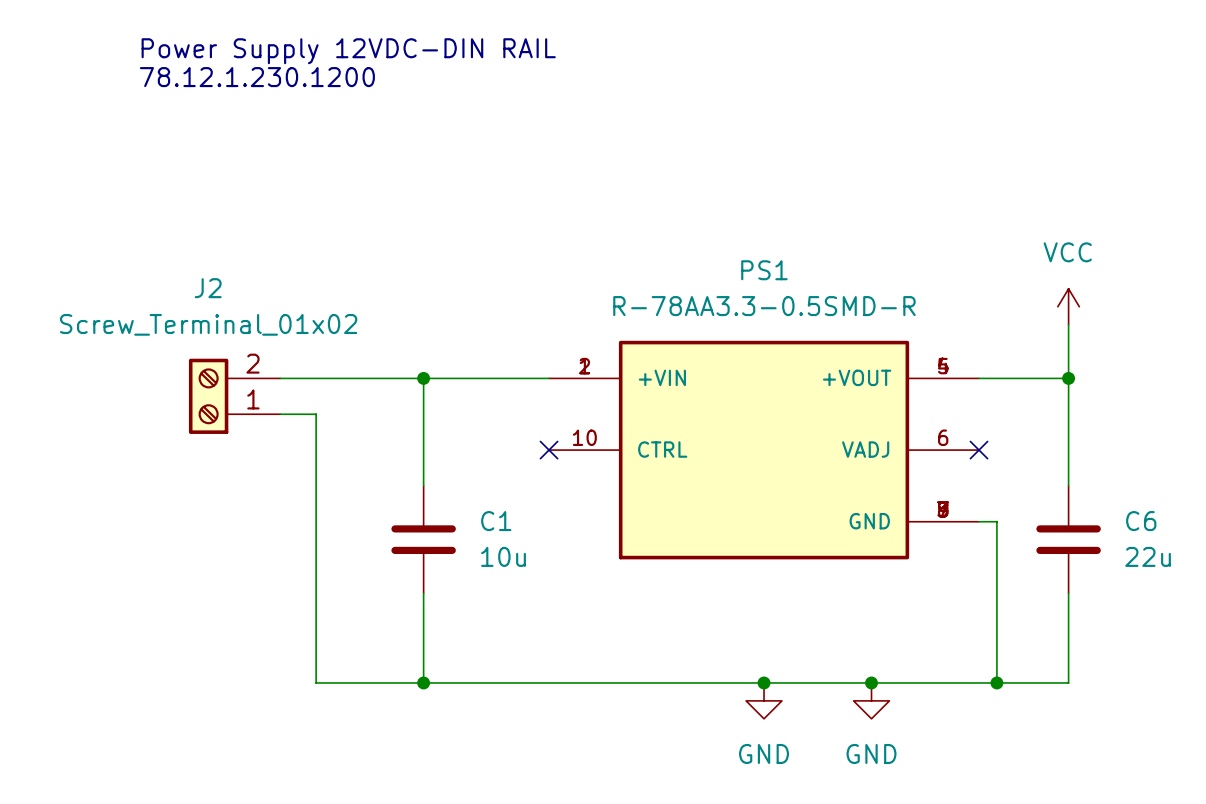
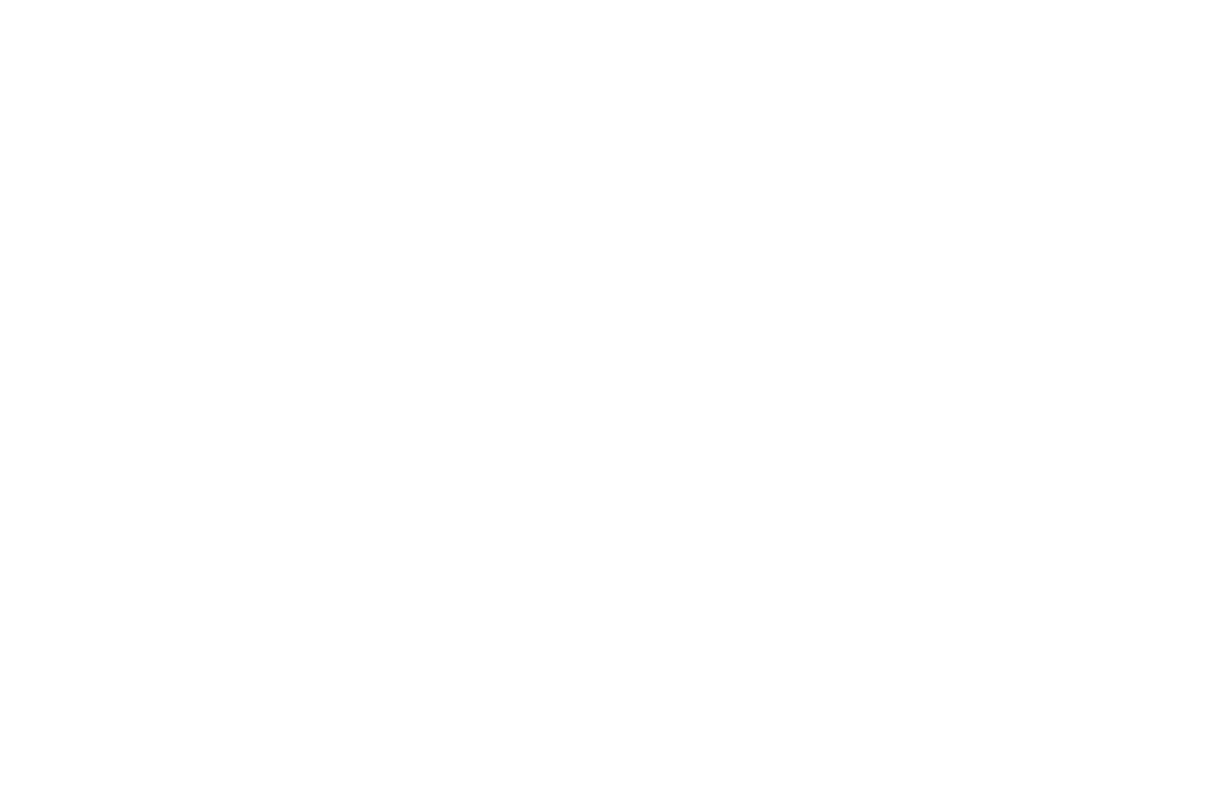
text: Power Supply 12VDC-DIN RAIL (348, 51) -> none
text: 78.12.1.230.1200 (257, 77) -> none
power symbol: VCC (1068, 306) -> none
wire: (1068, 324) (1068, 485) -> none
wire: (280, 378) (549, 378) -> none
wire: (423, 378) (423, 485) -> none
junction: (423, 378) -> none
wire: (979, 378) (1068, 378) -> none
junction: (1068, 378) -> none
J2: Screw_Terminal_01x02 (234, 396) -> none
wire: (280, 414) (316, 414) (316, 682) (1068, 682) (1068, 593) -> none
no-connect mark: (549, 450) -> none
PS1: R-78AA3.3-0.5SMD-R (764, 450) -> none
no-connect mark: (979, 450) -> none
wire: (979, 521) (996, 521) (996, 682) -> none
C1: 10u (423, 539) -> none
C6: 22u (1068, 539) -> none
wire: (423, 593) (423, 682) -> none
junction: (423, 682) -> none
junction: (764, 682) -> none
junction: (871, 682) -> none
junction: (996, 682) -> none
power symbol: GND (764, 700) -> none
power symbol: GND (871, 700) -> none

